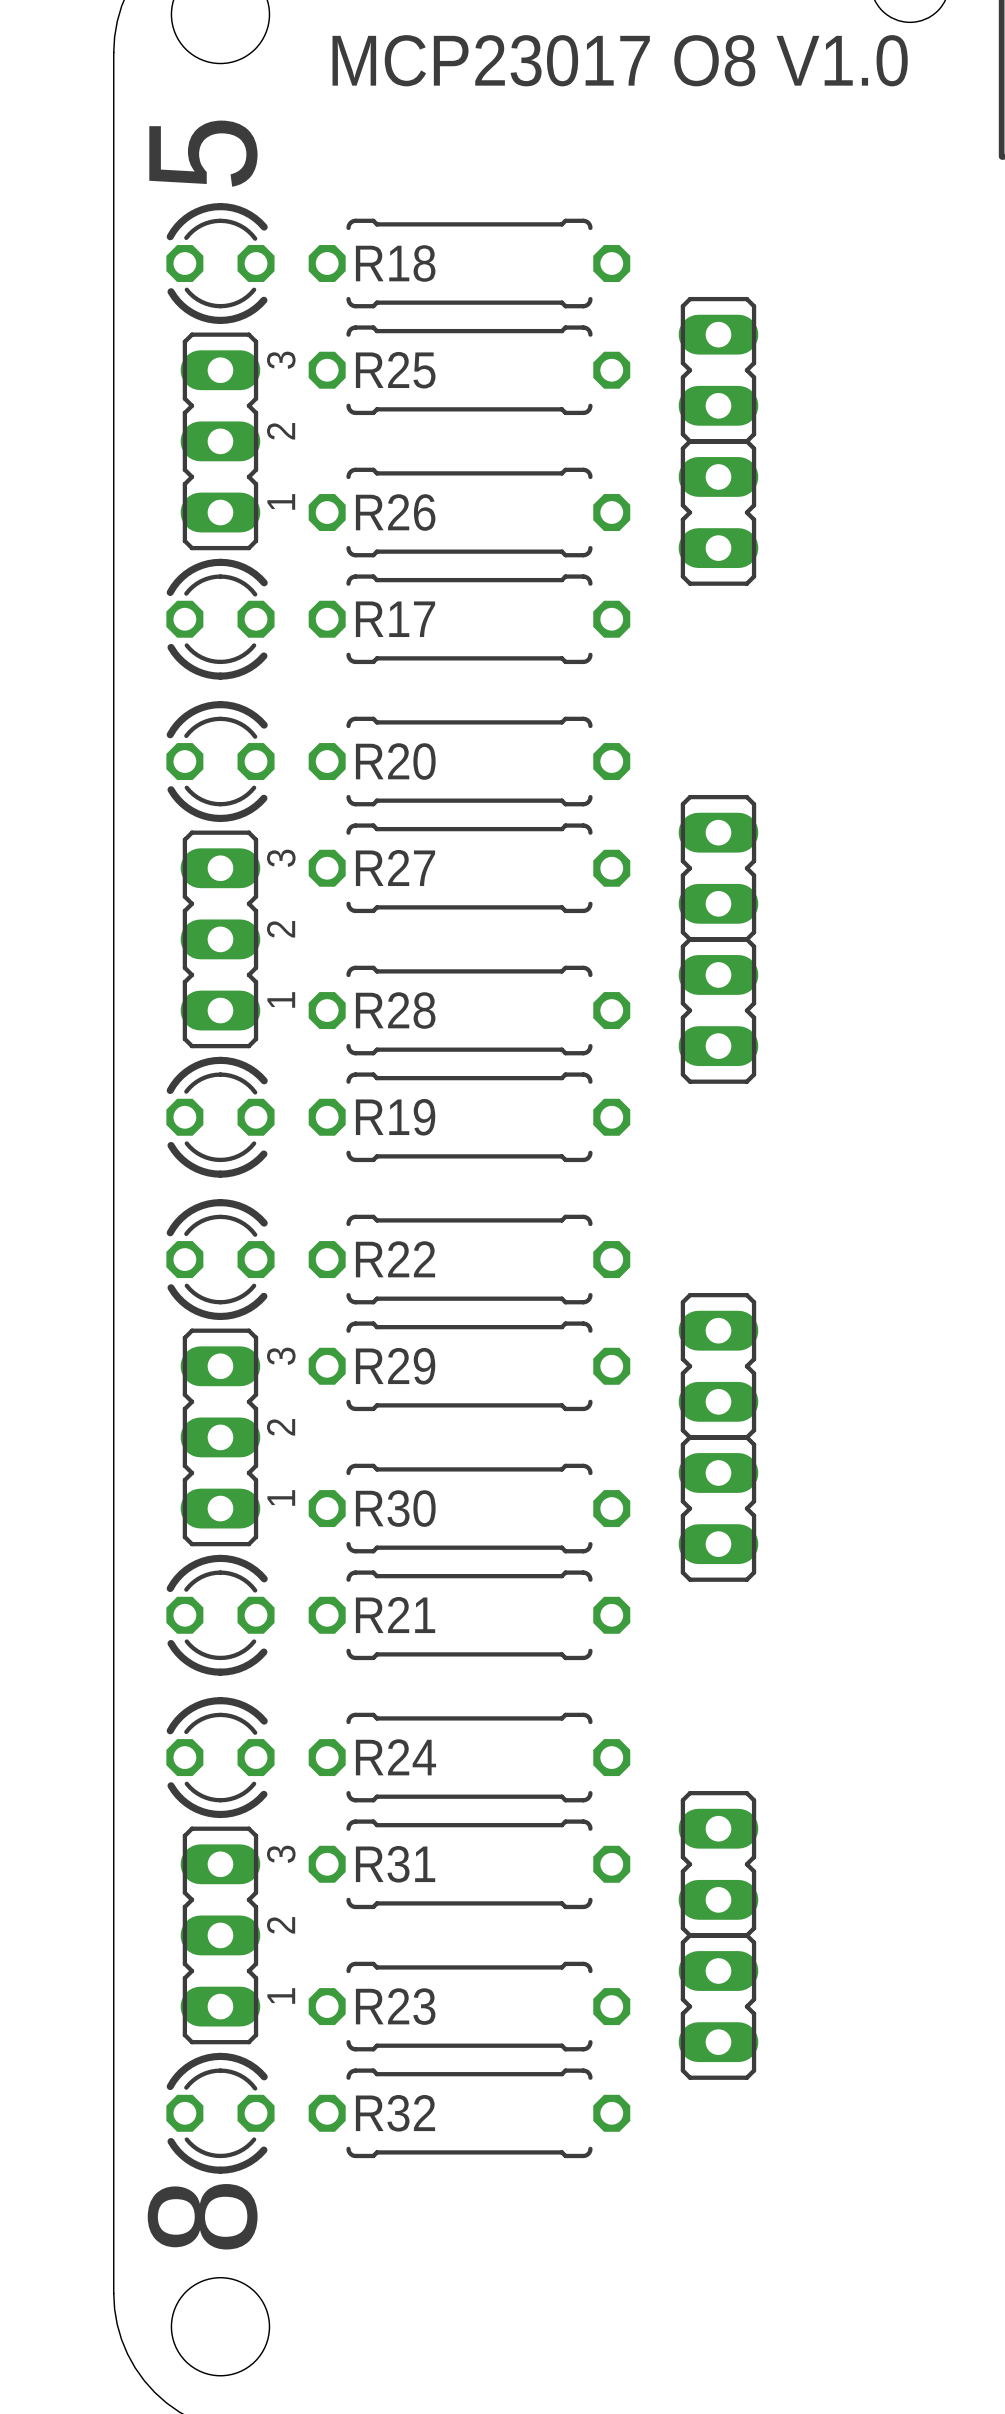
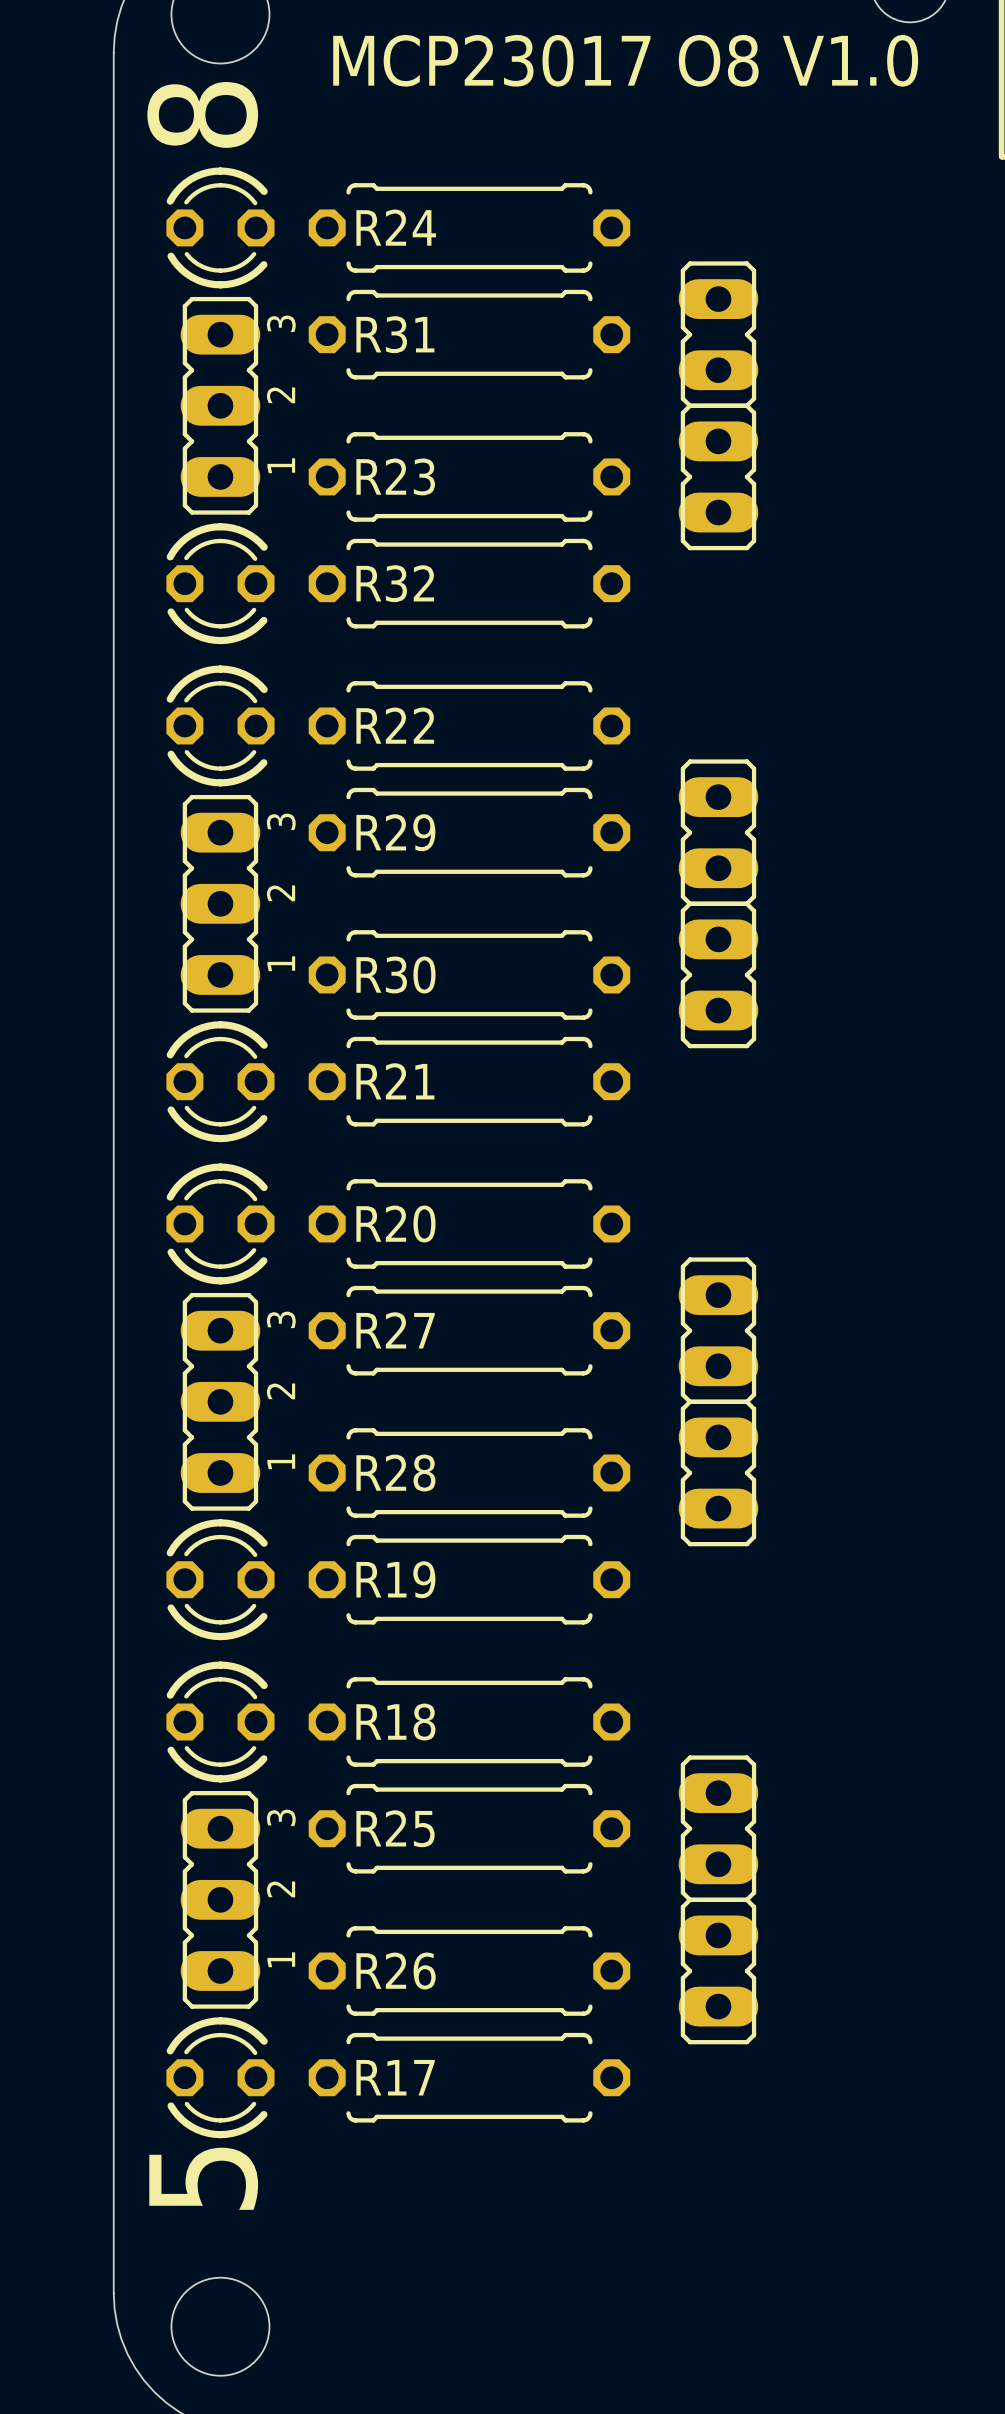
text: none -> 8 (202, 114)
text: 5 (203, 153) -> none
part position: (220, 263) -> (220, 227)
R18 position: (469, 263) -> (469, 1722)
R25 position: (469, 370) -> (469, 1828)
part position: (718, 370) -> (718, 334)
part position: (220, 441) -> (220, 405)
R26 position: (469, 512) -> (469, 1971)
part position: (718, 512) -> (718, 476)
part position: (220, 619) -> (220, 583)
R17 position: (469, 619) -> (469, 2077)
part position: (220, 761) -> (220, 725)
R20 position: (469, 761) -> (469, 1223)
R27 position: (469, 868) -> (469, 1330)
part position: (718, 868) -> (718, 832)
part position: (220, 939) -> (220, 903)
R28 position: (469, 1010) -> (469, 1472)
part position: (718, 1010) -> (718, 974)
part position: (220, 1117) -> (220, 1081)
R19 position: (469, 1117) -> (469, 1579)
part position: (220, 1259) -> (220, 1223)
R22 position: (469, 1259) -> (469, 725)
R29 position: (469, 1366) -> (469, 832)
part position: (718, 1366) -> (718, 1330)
part position: (220, 1437) -> (220, 1401)
R30 position: (469, 1508) -> (469, 974)
part position: (718, 1508) -> (718, 1472)
part position: (220, 1615) -> (220, 1579)
R21 position: (469, 1615) -> (469, 1081)
part position: (220, 1757) -> (220, 1722)
R24 position: (469, 1757) -> (469, 227)
R31 position: (469, 1864) -> (469, 334)
part position: (718, 1864) -> (718, 1828)
part position: (220, 1935) -> (220, 1899)
R32 position: (469, 2006) -> (469, 476)
part position: (718, 2006) -> (718, 1971)
part position: (220, 2113) -> (220, 2077)
R23 position: (469, 2113) -> (469, 583)
text: none -> 5 (203, 2178)
text: 8 (202, 2216) -> none

